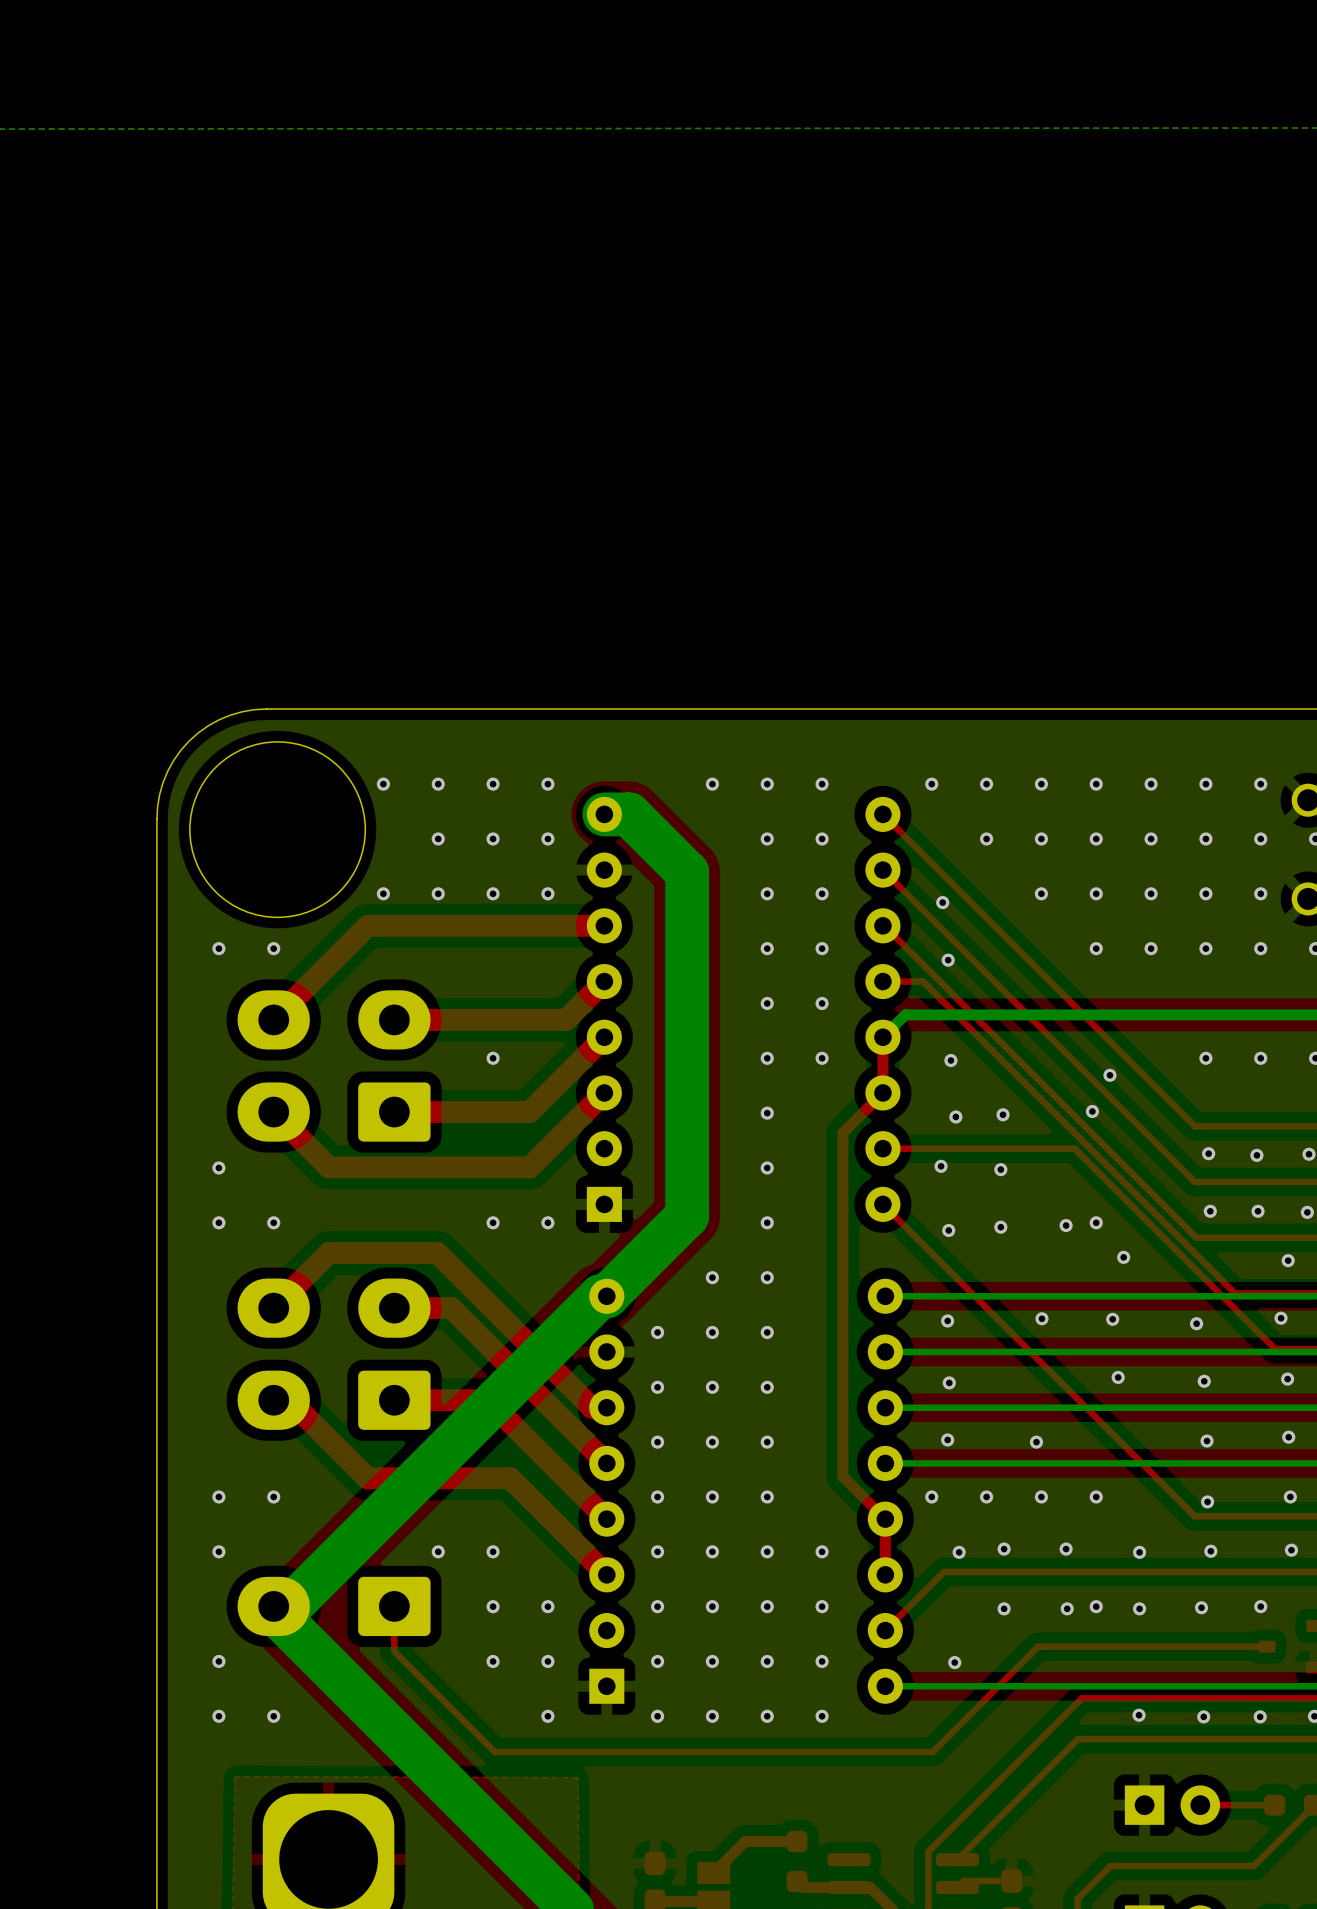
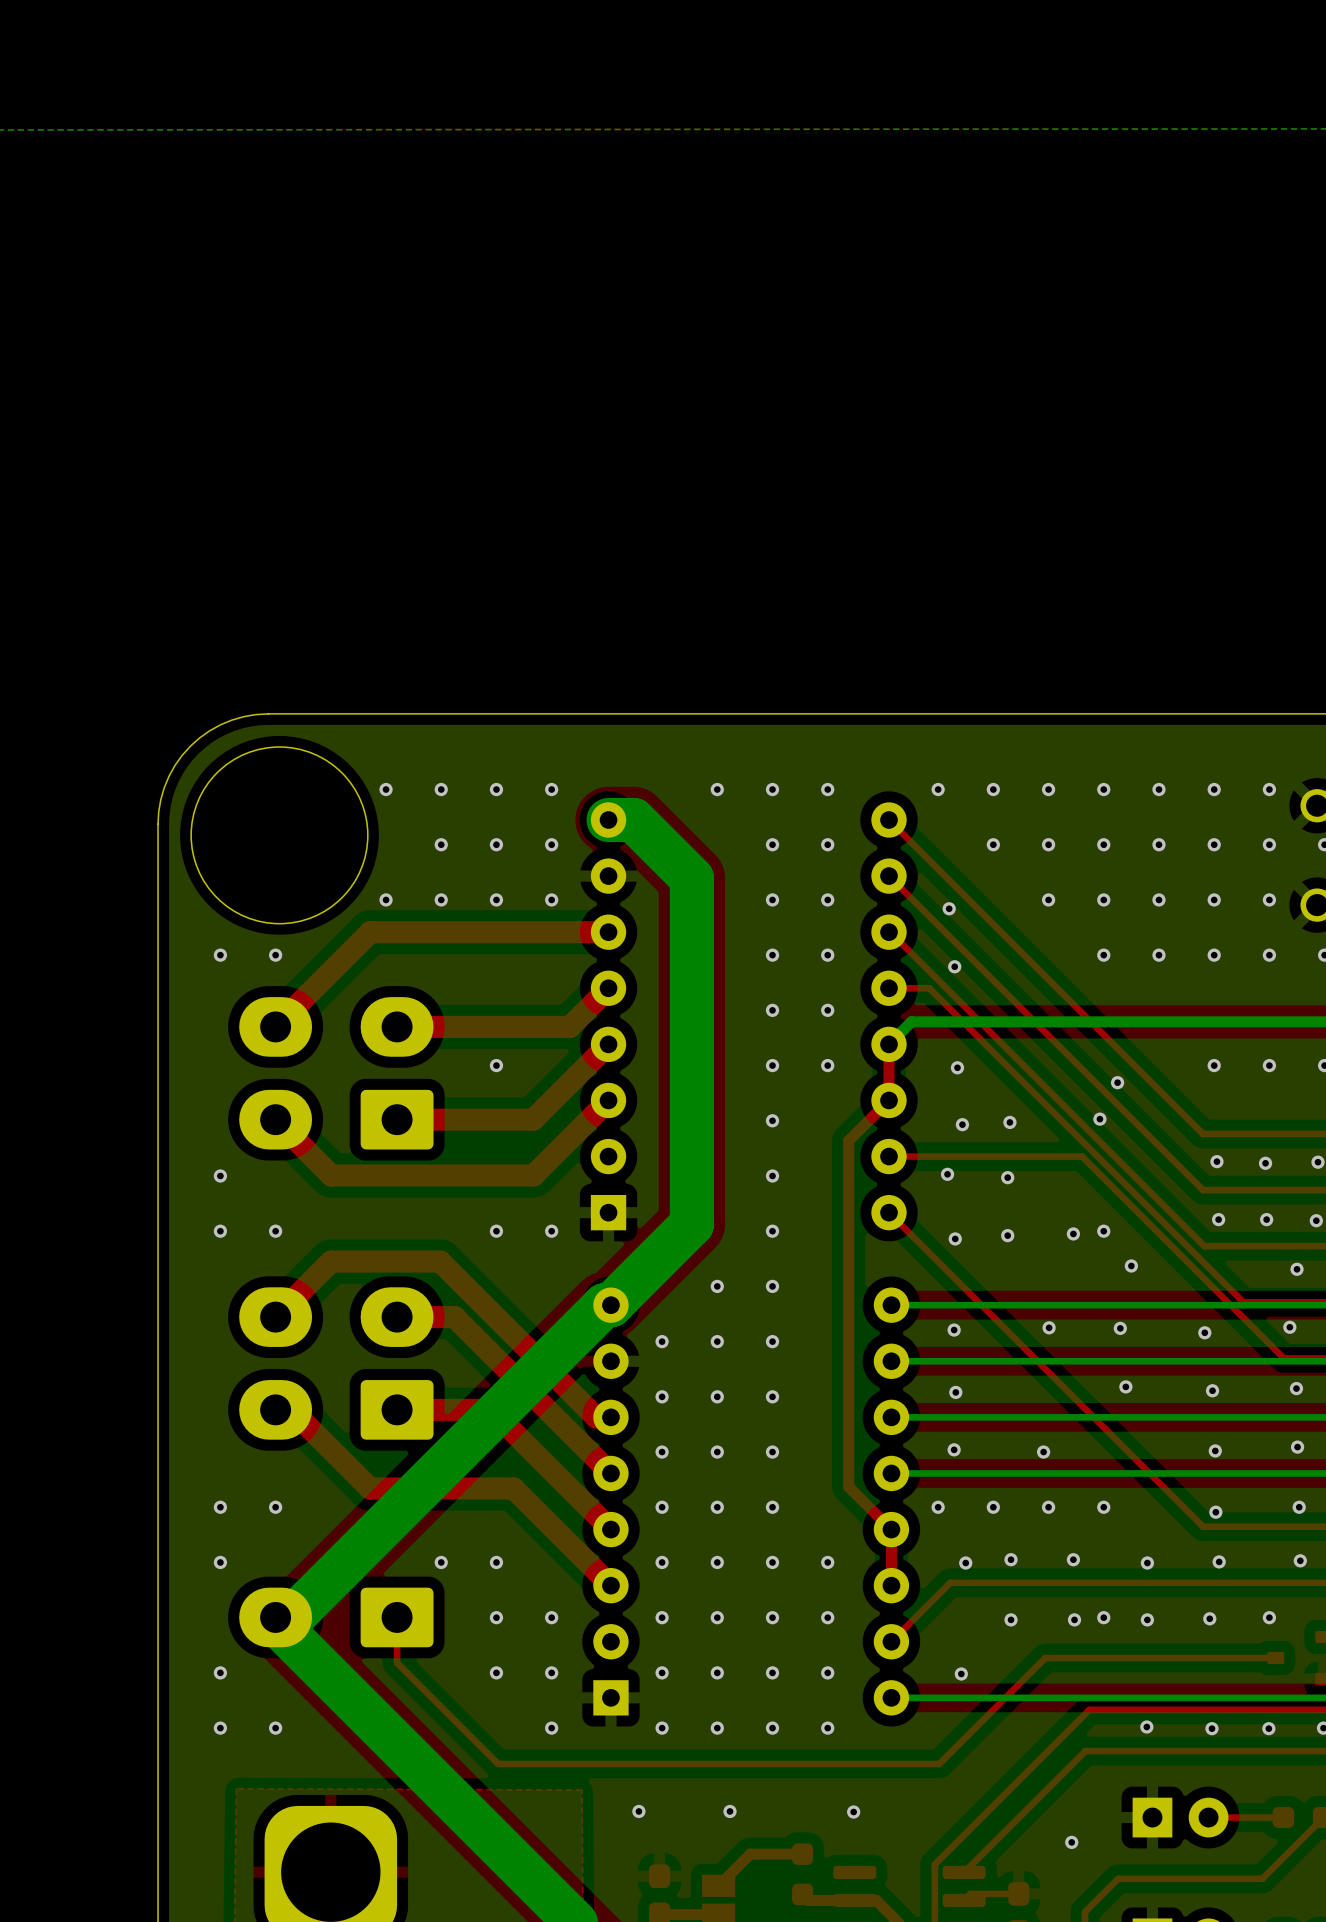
via: none -> (638, 1811)
via: none -> (730, 1811)
via: none -> (853, 1812)
via: none -> (1071, 1842)

